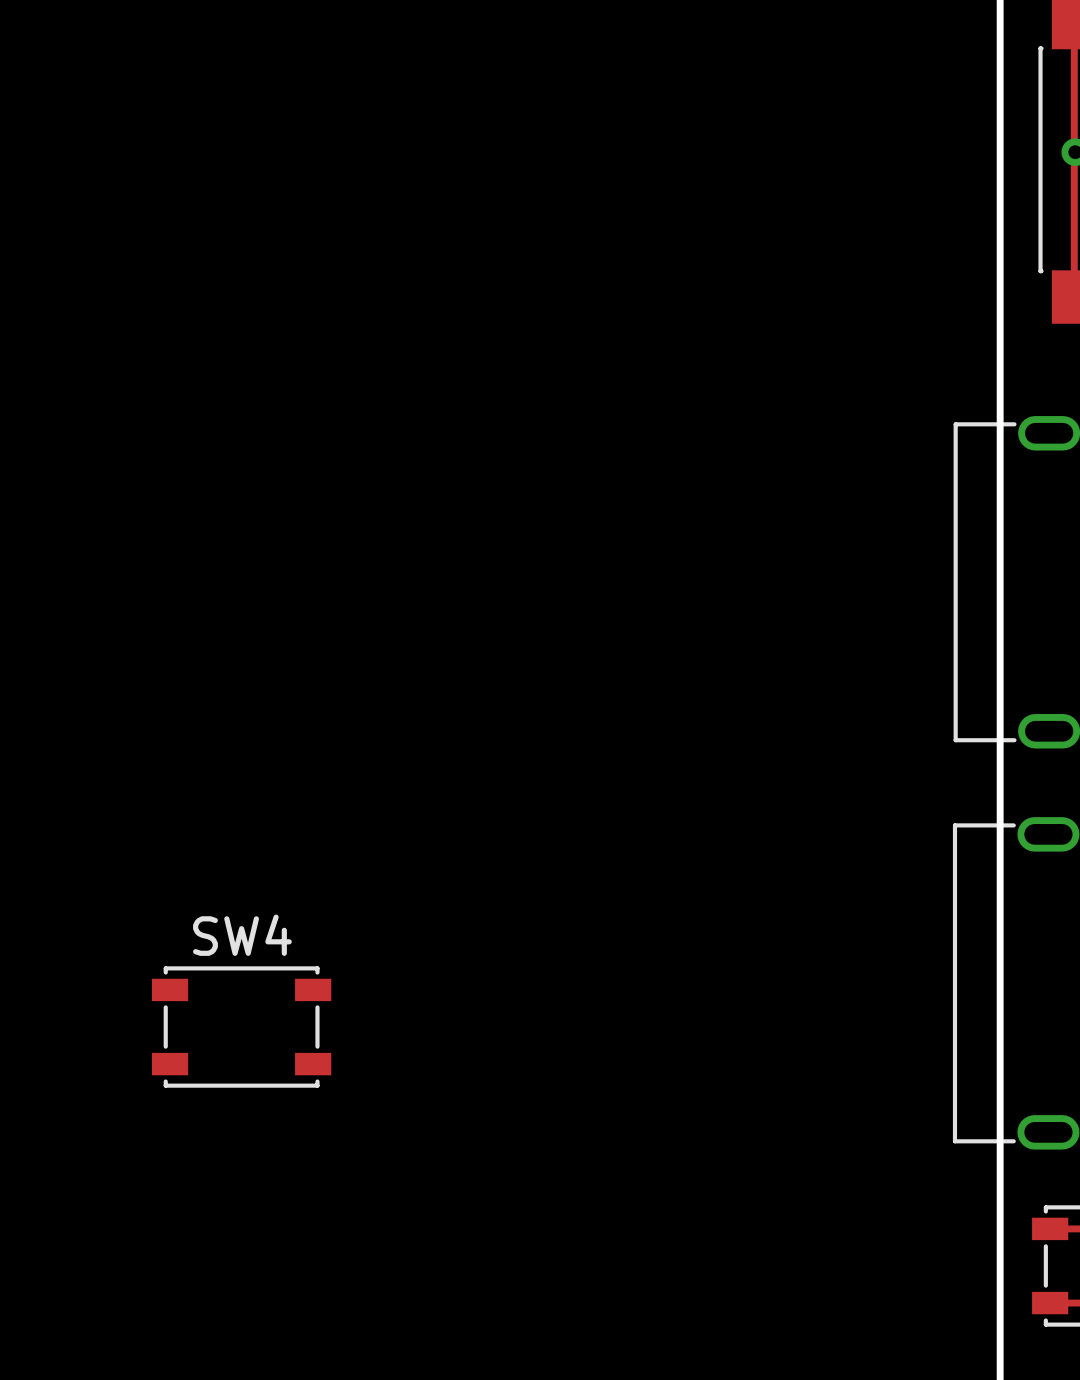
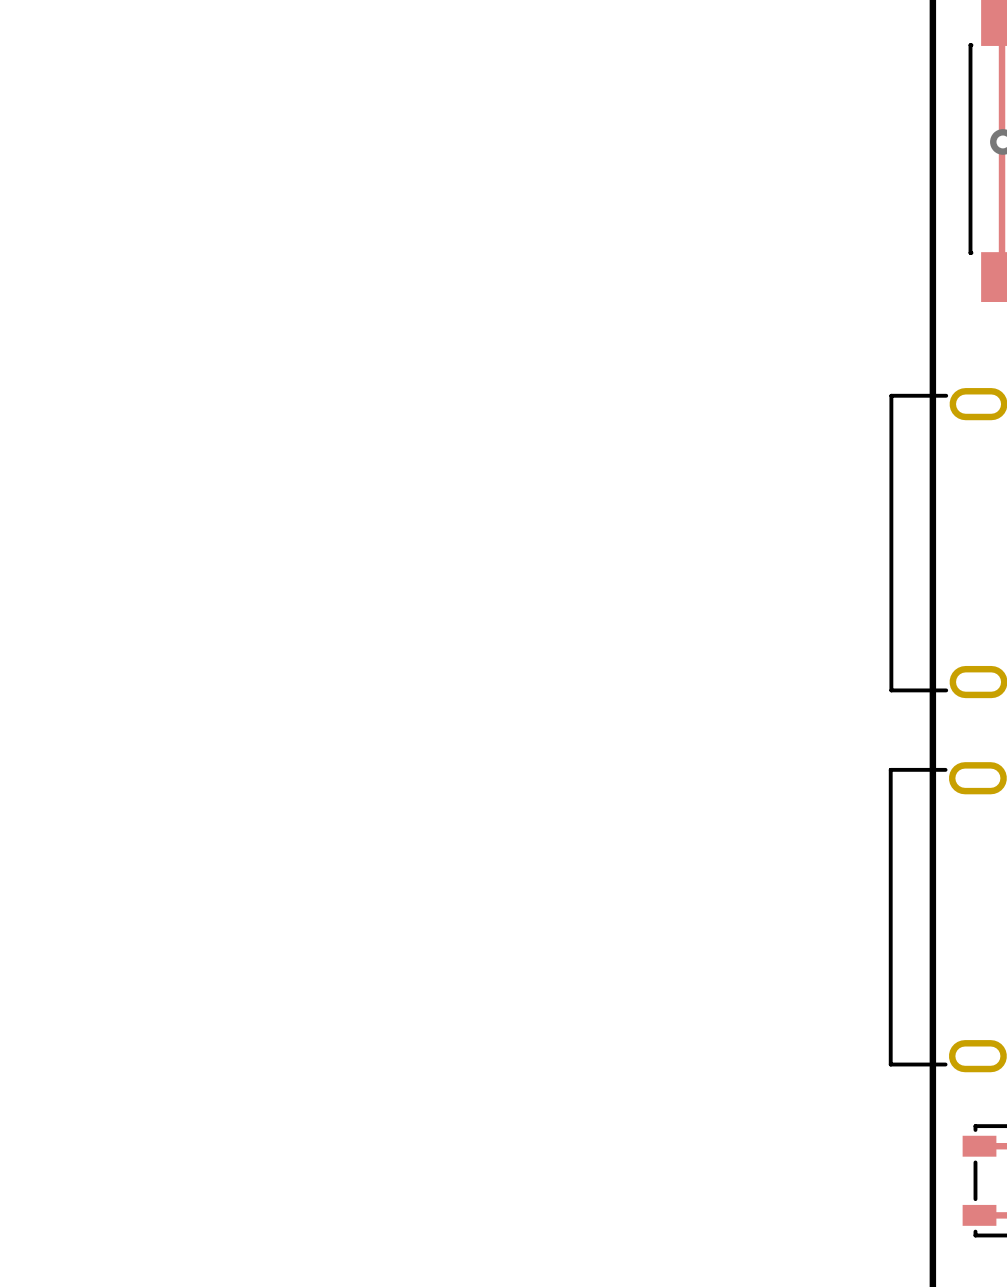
SW4: (241, 1027) -> none

